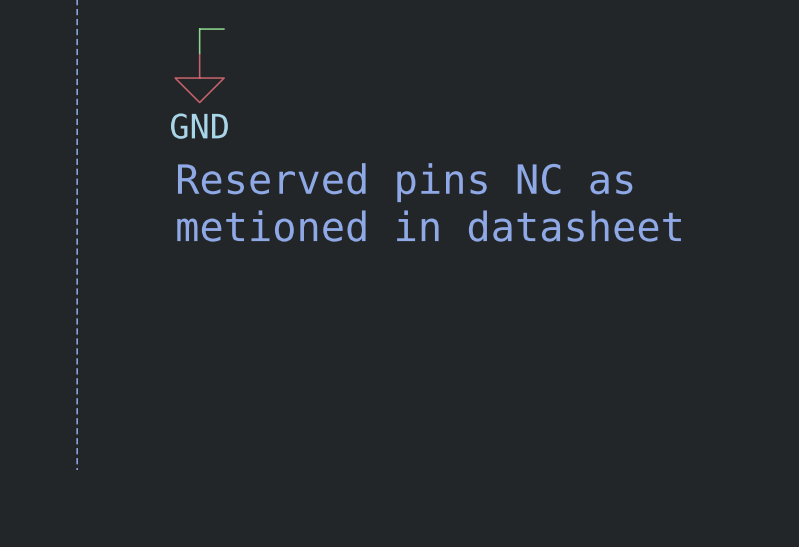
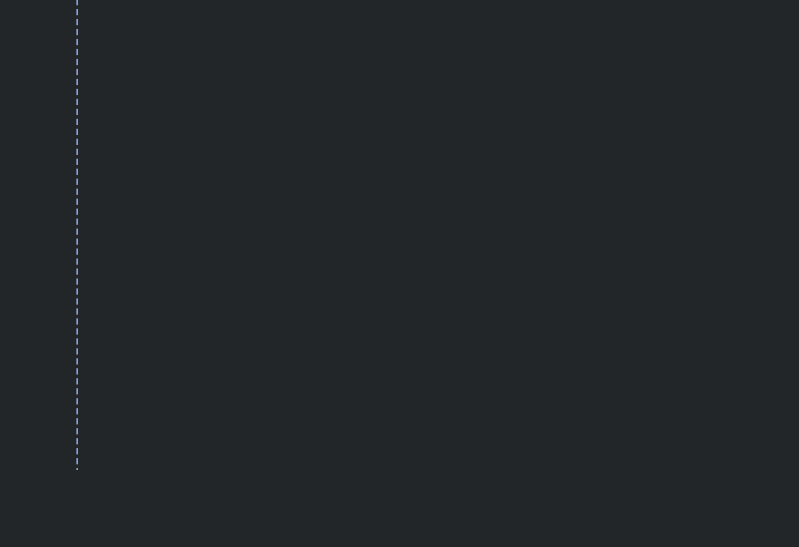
wire: (224, 29) (199, 29) (199, 53) -> none
power symbol: GND (199, 78) -> none
text: Reserved pins NC as (405, 182) -> none
text: metioned in datasheet (429, 226) -> none

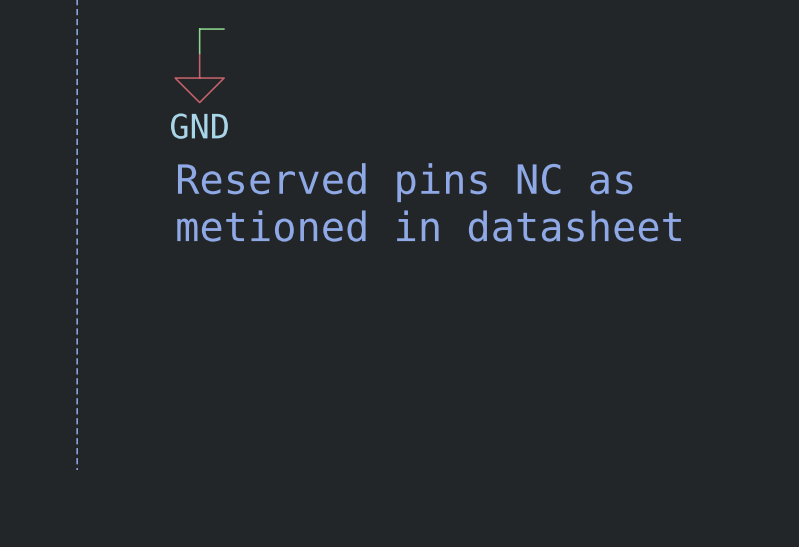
wire: none -> (224, 29) (199, 29) (199, 53)
power symbol: none -> GND (199, 78)
text: none -> Reserved pins NC as (405, 182)
text: none -> metioned in datasheet (429, 226)

